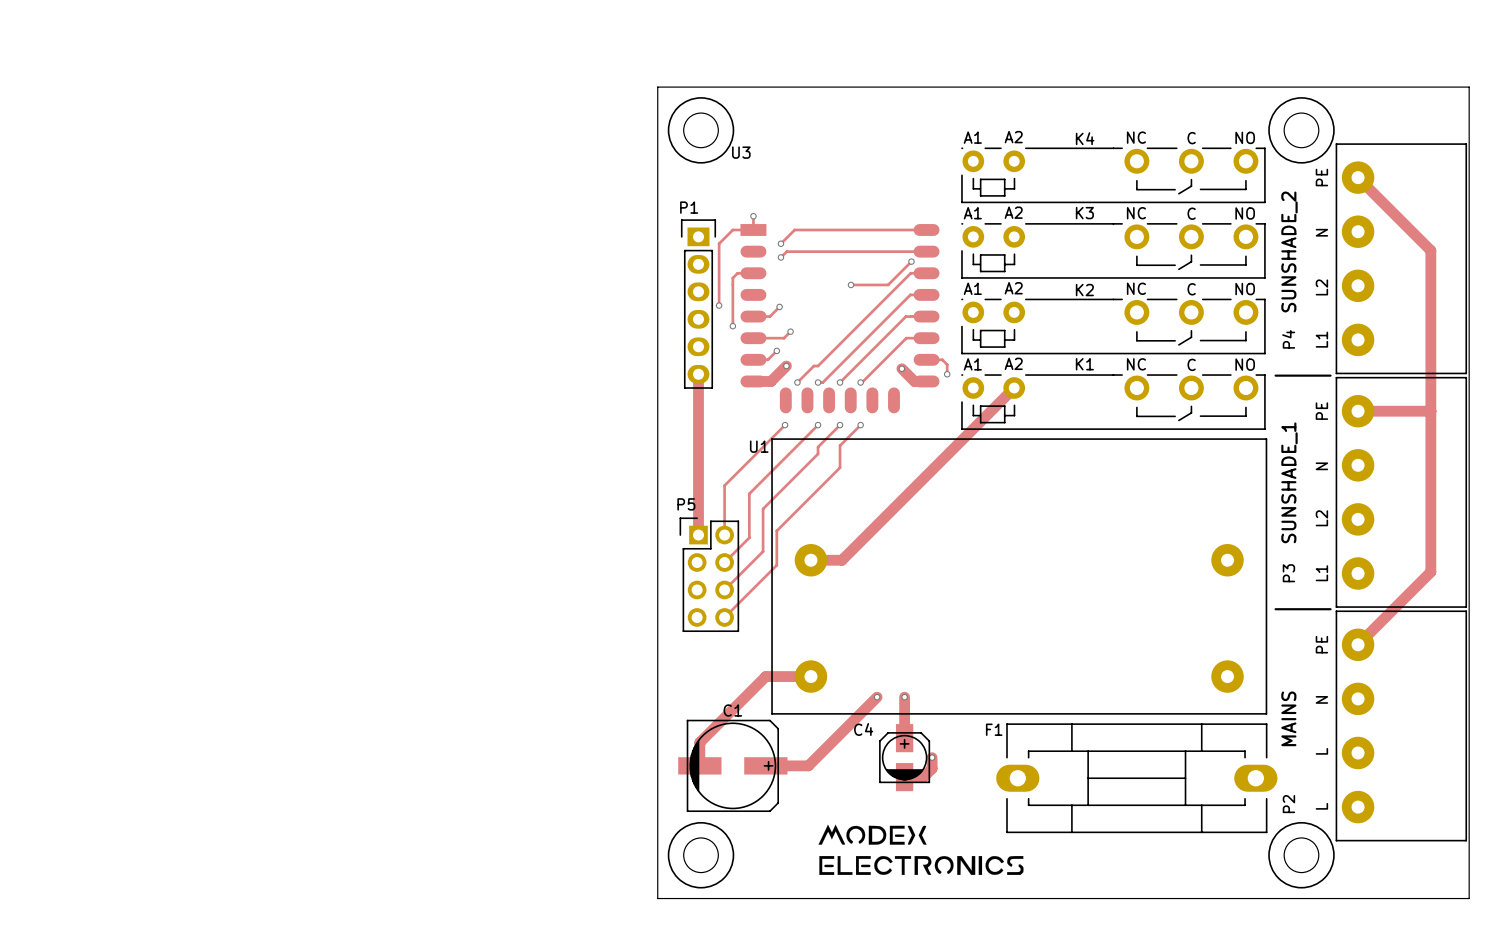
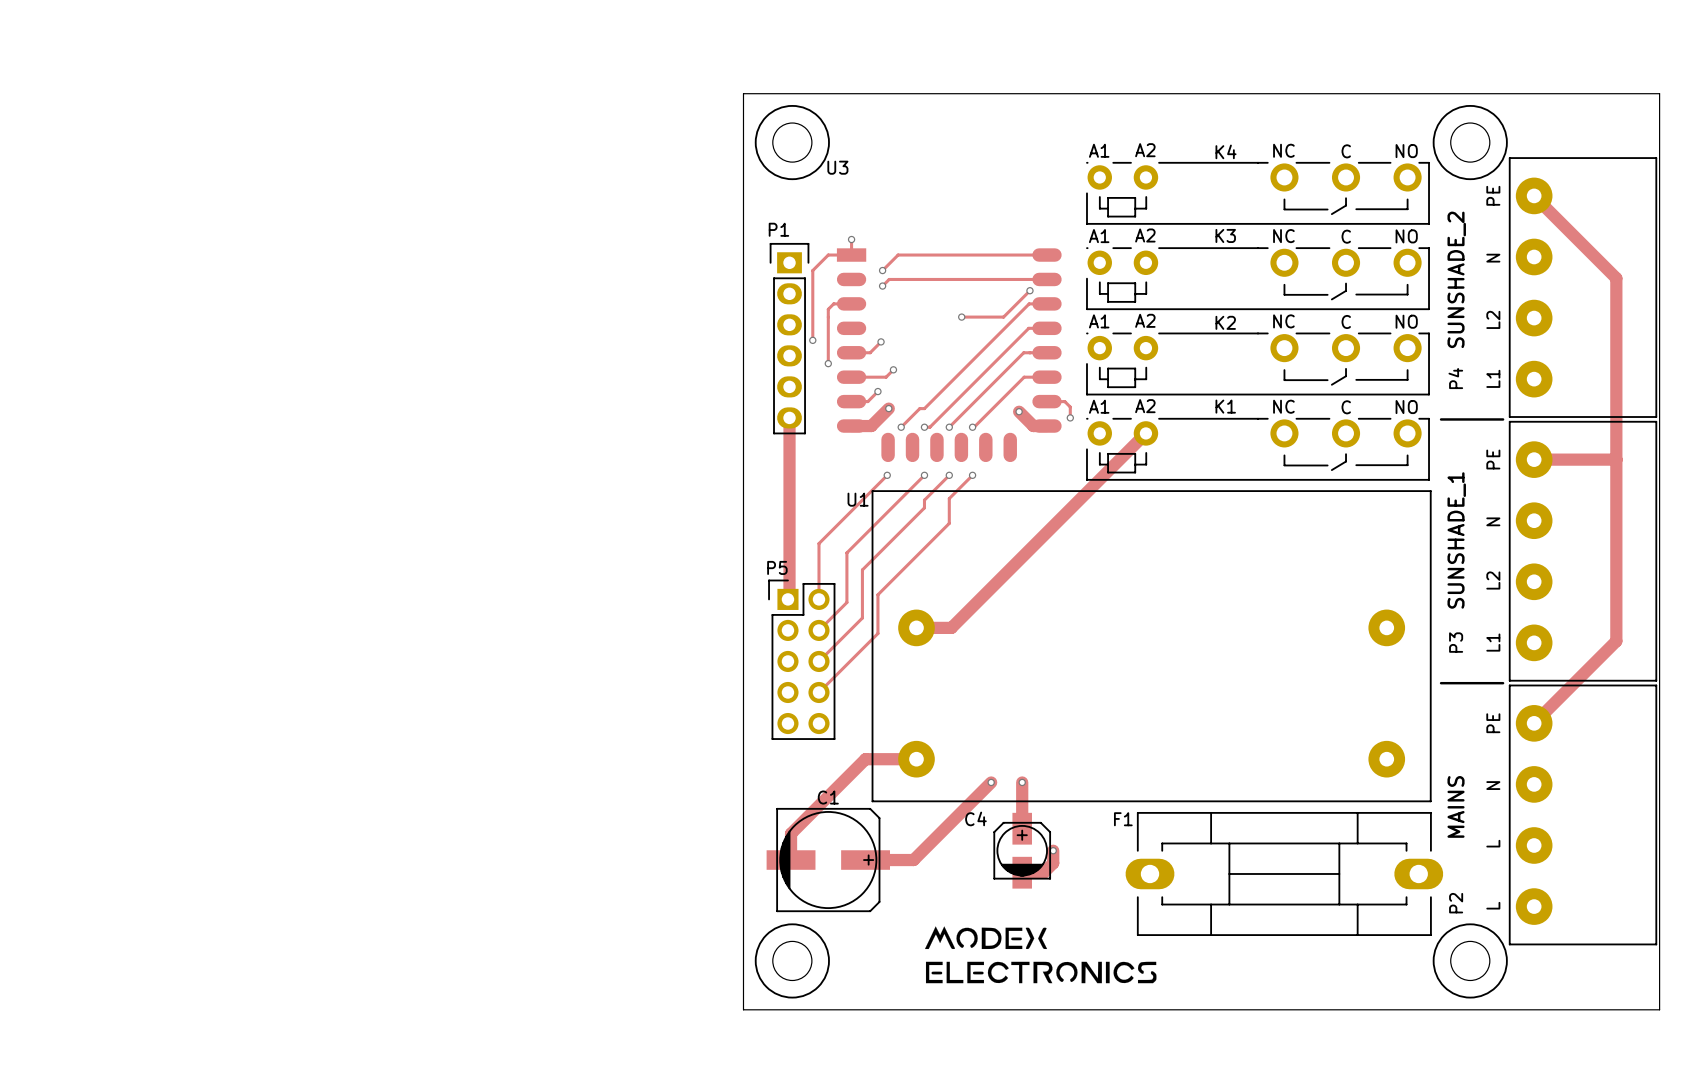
P5 footprint: [679, 517, 740, 633] -> [768, 579, 836, 740]

